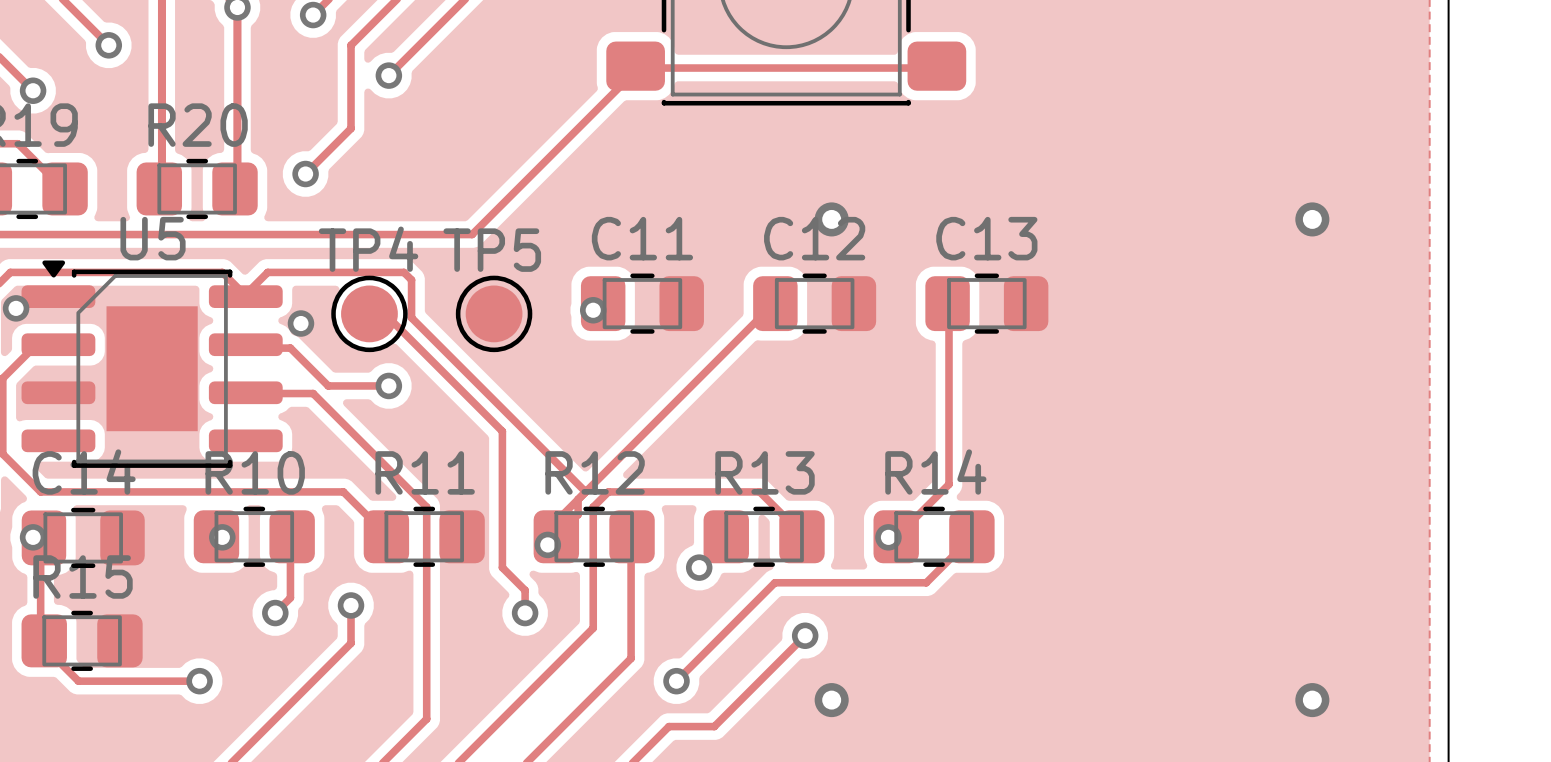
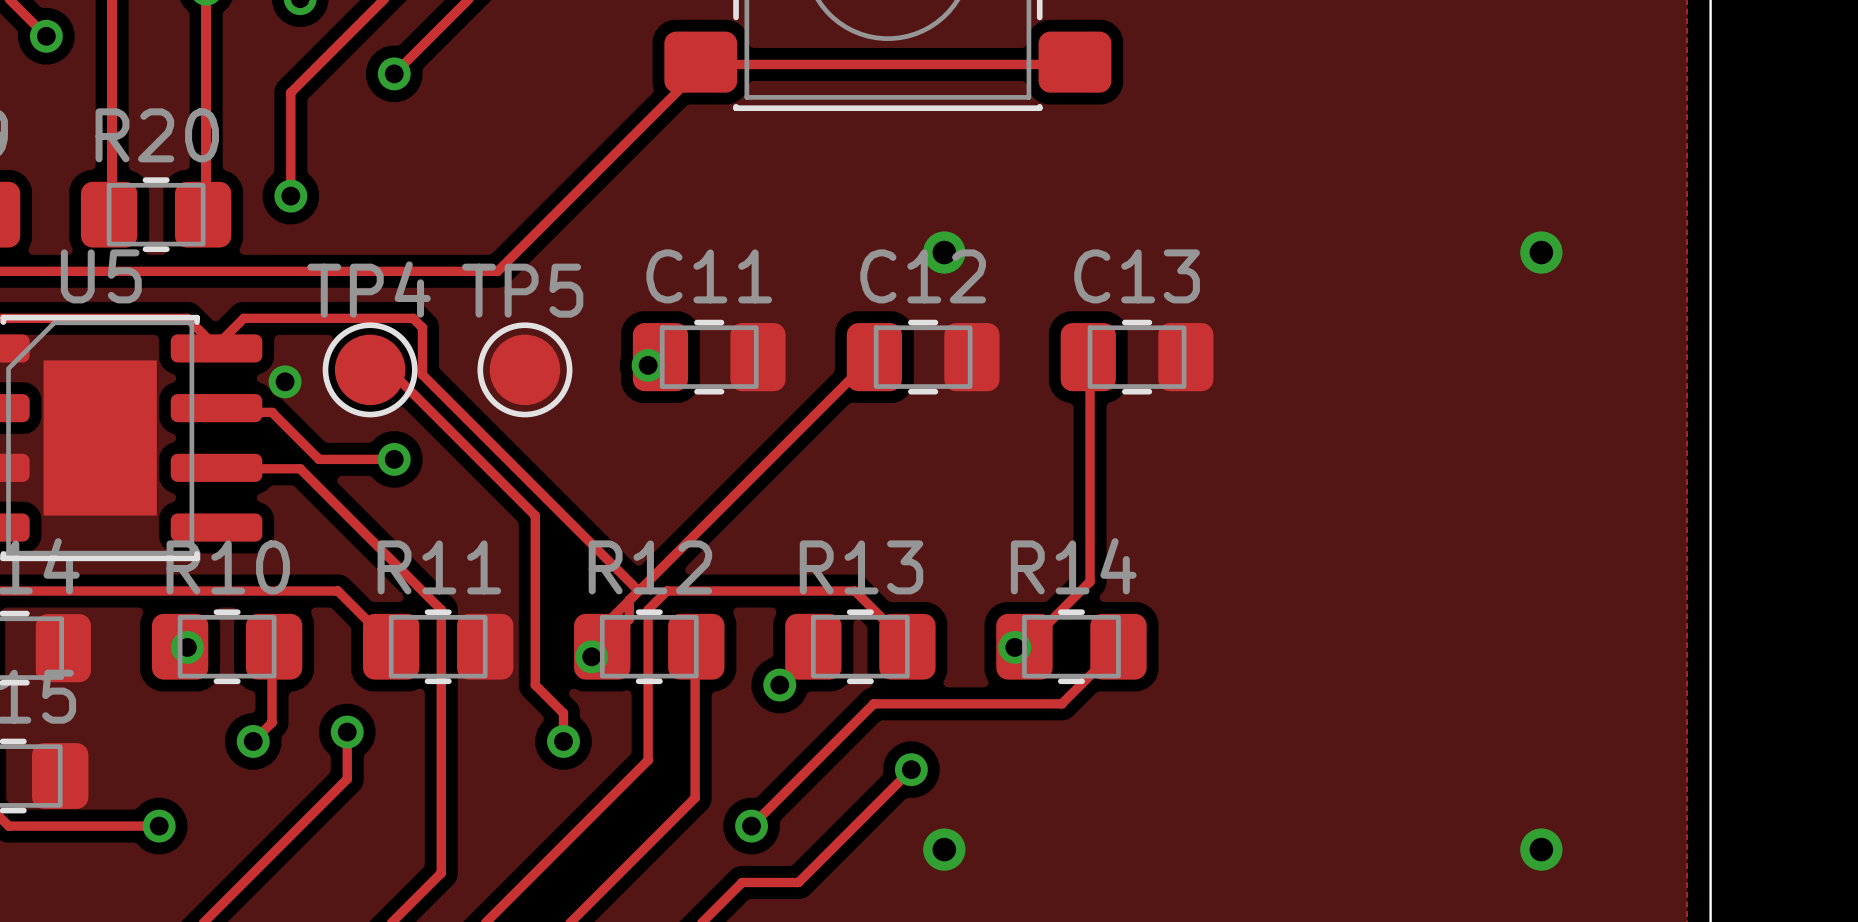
track: (351, 45) (351, 128) (305, 174) -> (347, 36) (290, 92) (290, 196)

